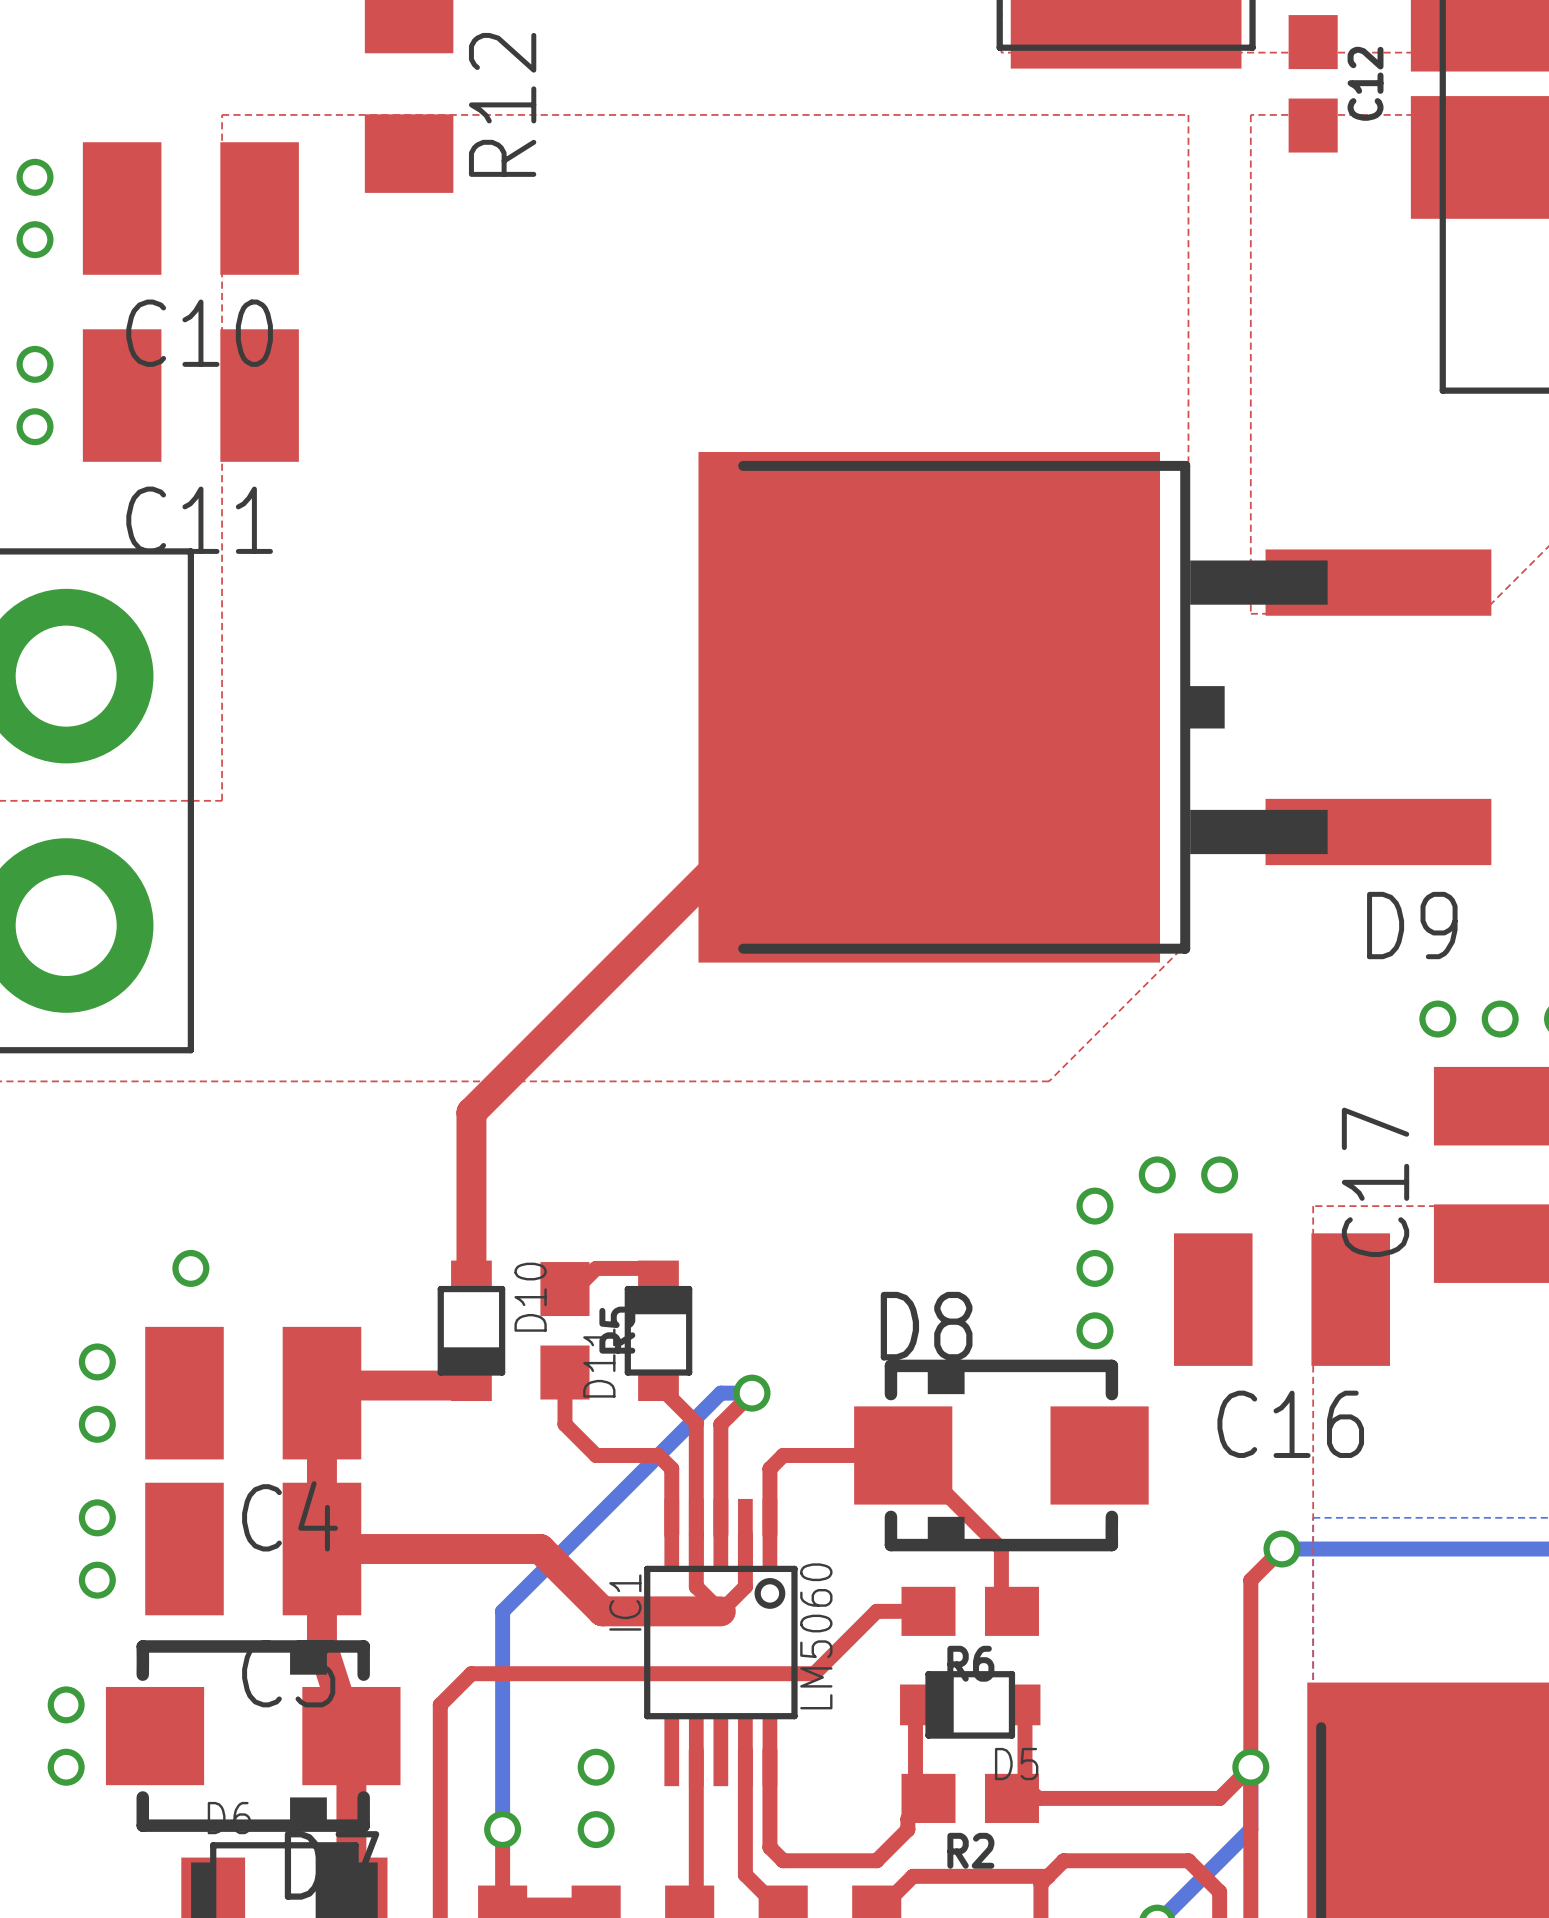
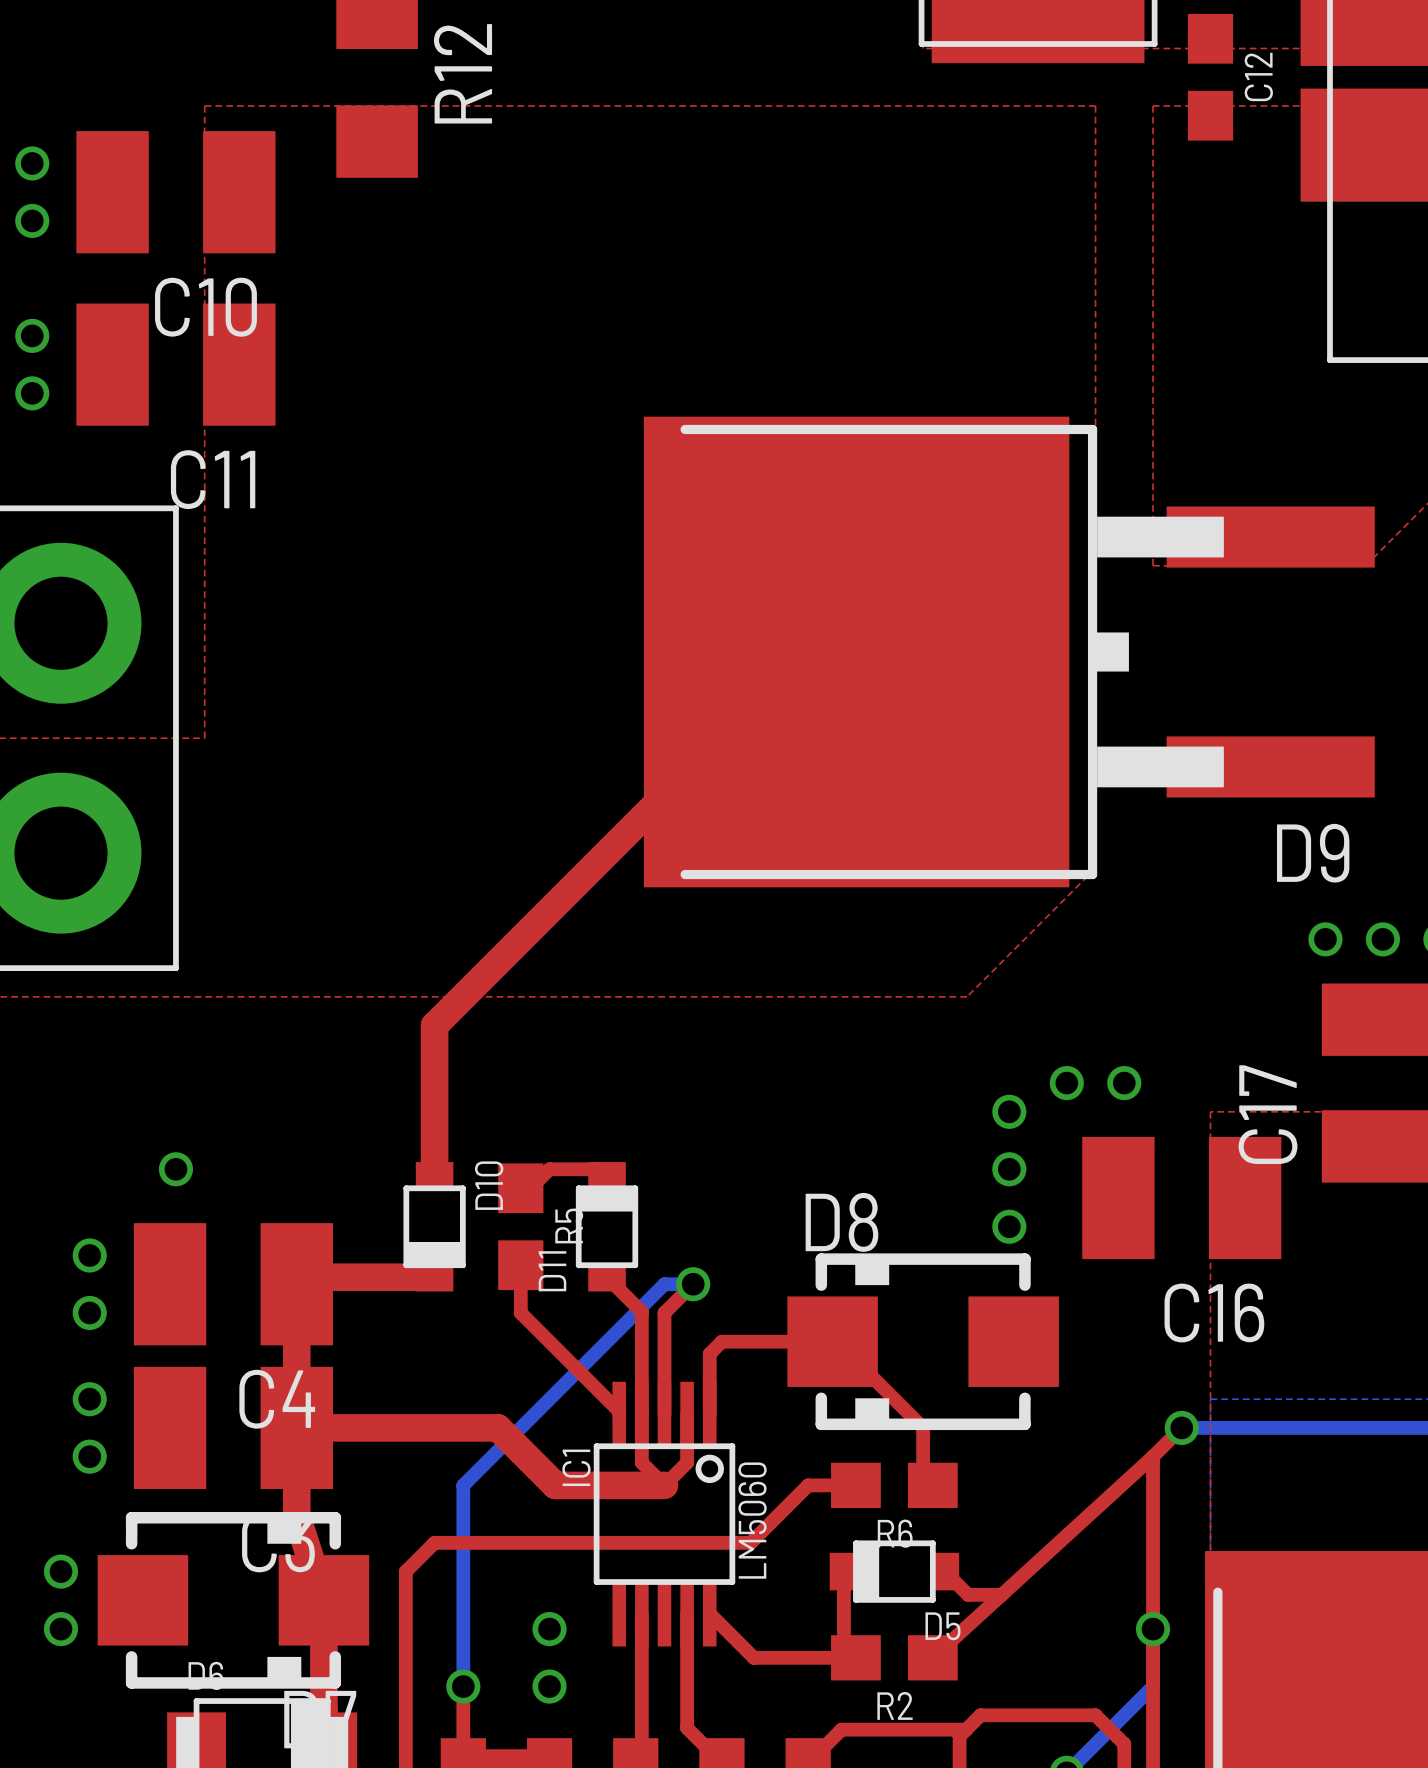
top track: (596, 1455) (658, 1455) (671, 1468) (671, 1531) -> (549, 1341) (619, 1411)
top track: none -> (1153, 1456) (932, 1657)
top track: (1024, 1704) (1024, 1785) (1037, 1798) (1219, 1798) (1250, 1767) -> (944, 1571) (968, 1594) (1001, 1594)
top track: (769, 1750) (769, 1847) (783, 1860) (876, 1860) (907, 1829) (907, 1819) (928, 1798) -> (709, 1613) (753, 1657) (855, 1657)

